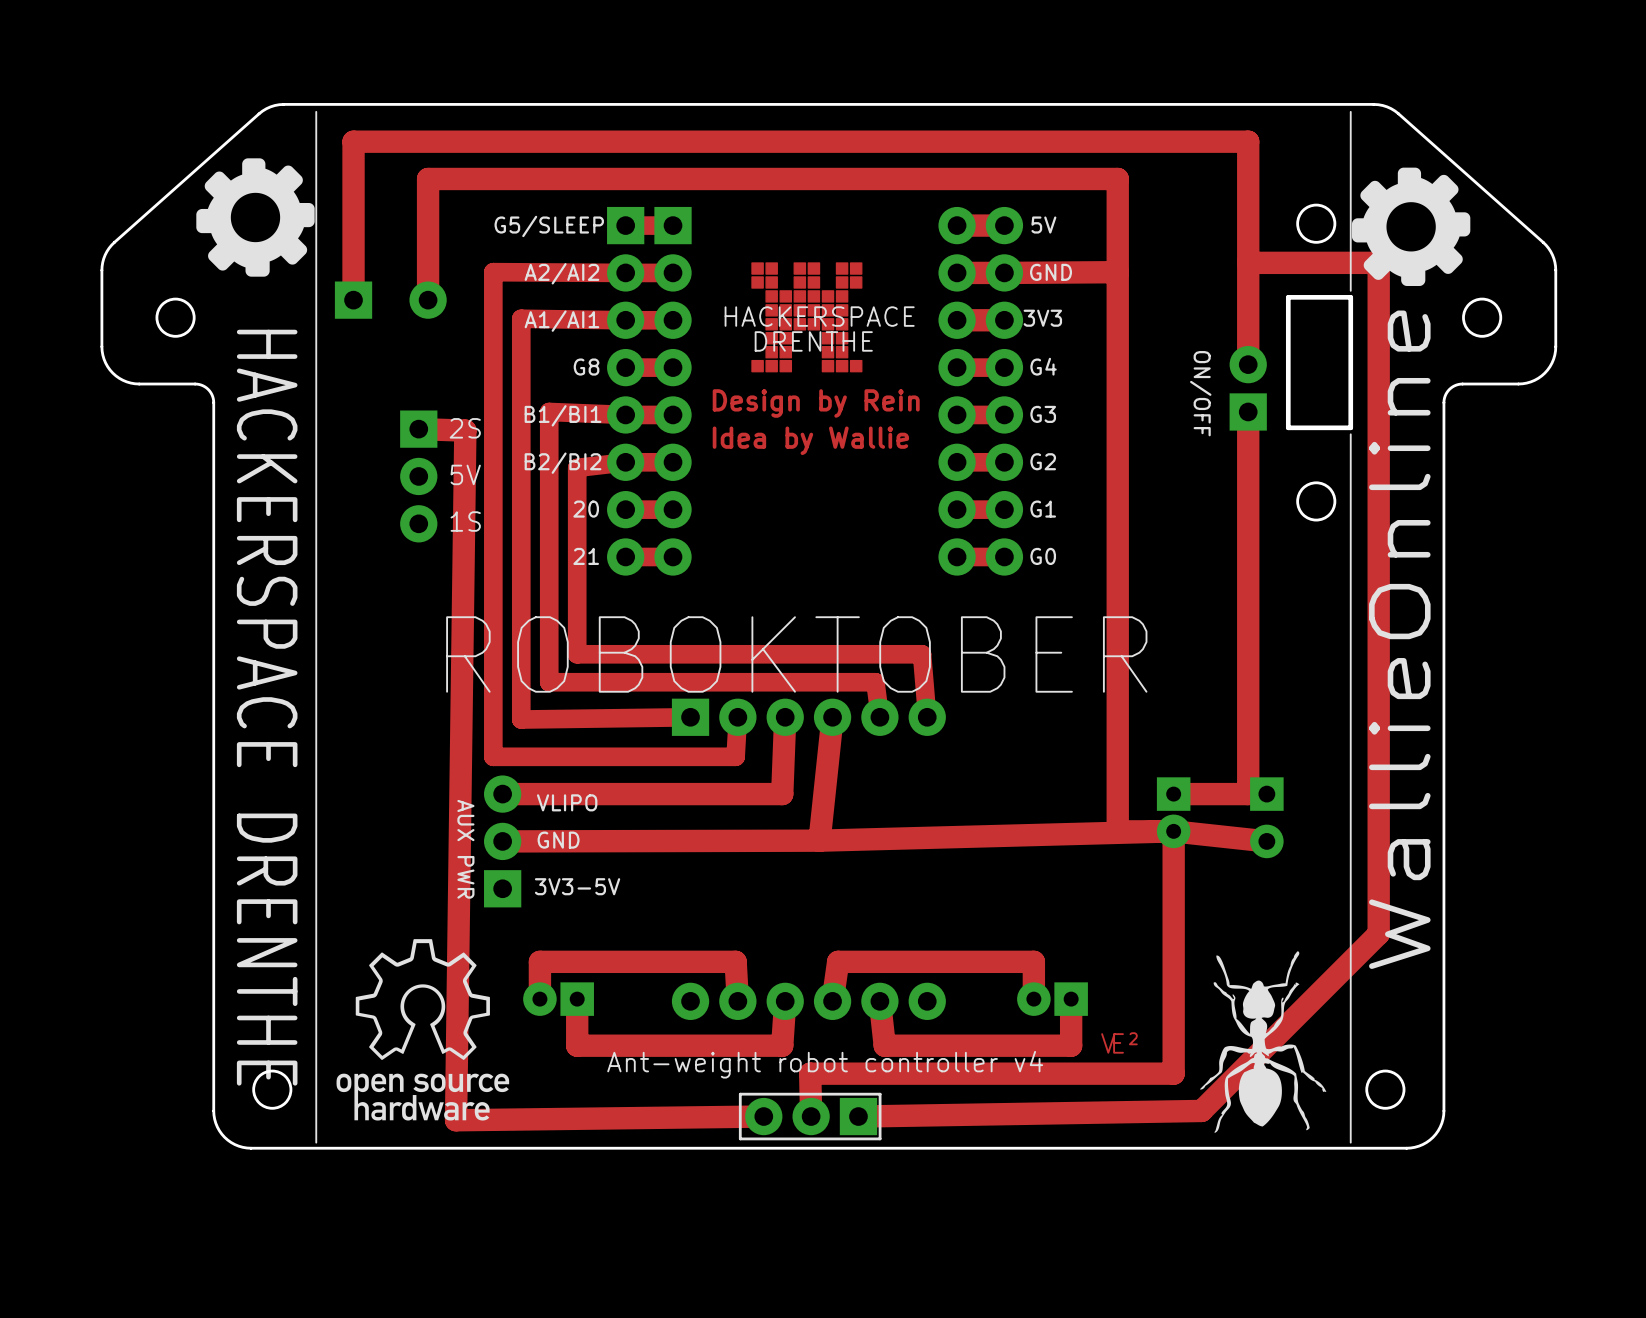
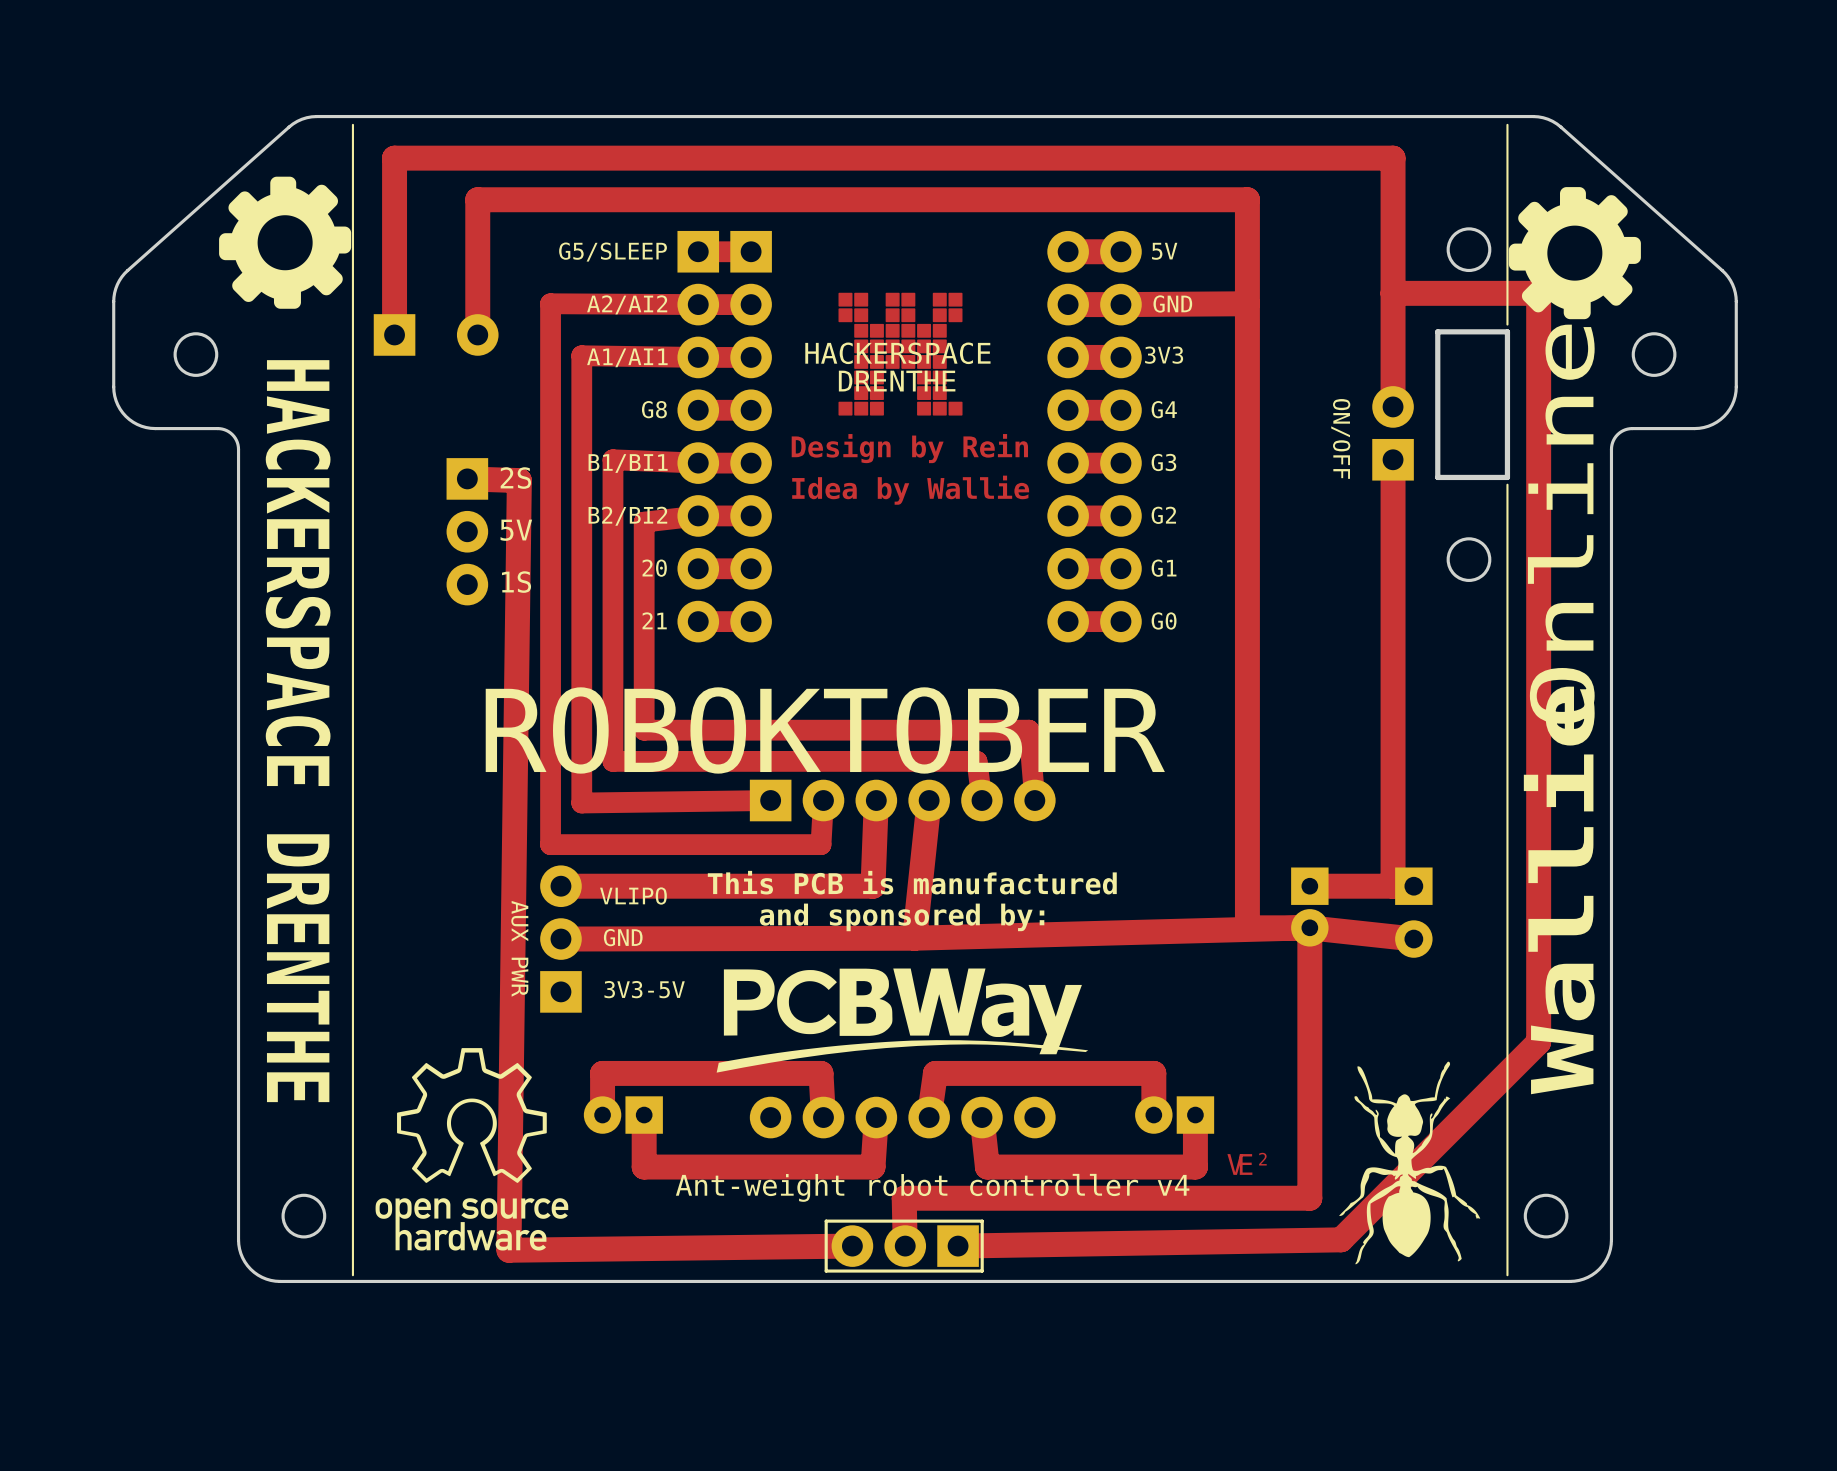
text: none -> This PCB is manufactured (912, 882)
text: none -> and sponsored by: (902, 917)
drawing: none -> [716, 968, 1089, 1073]

